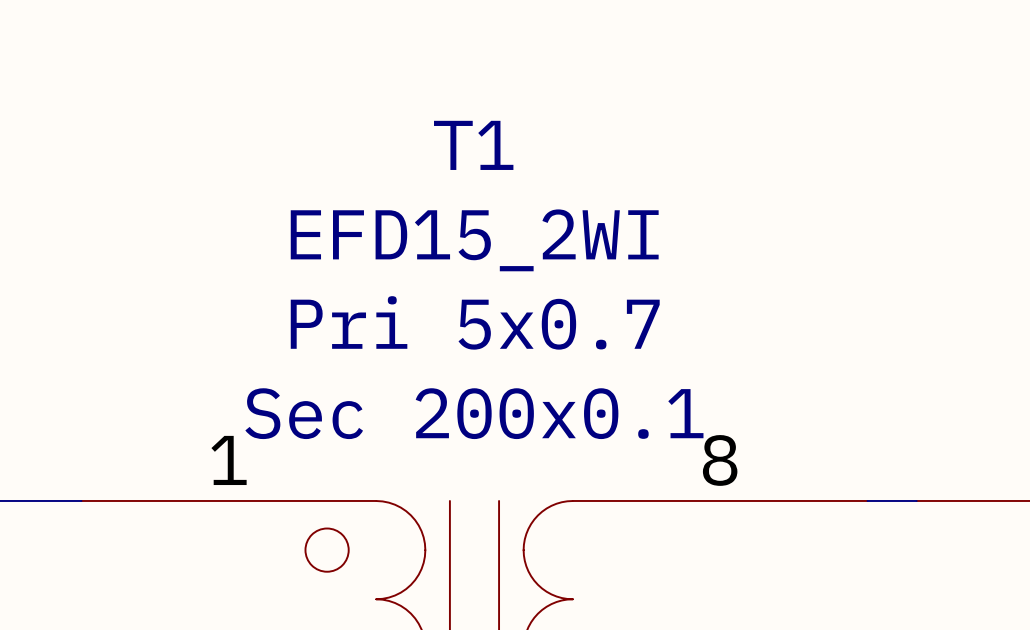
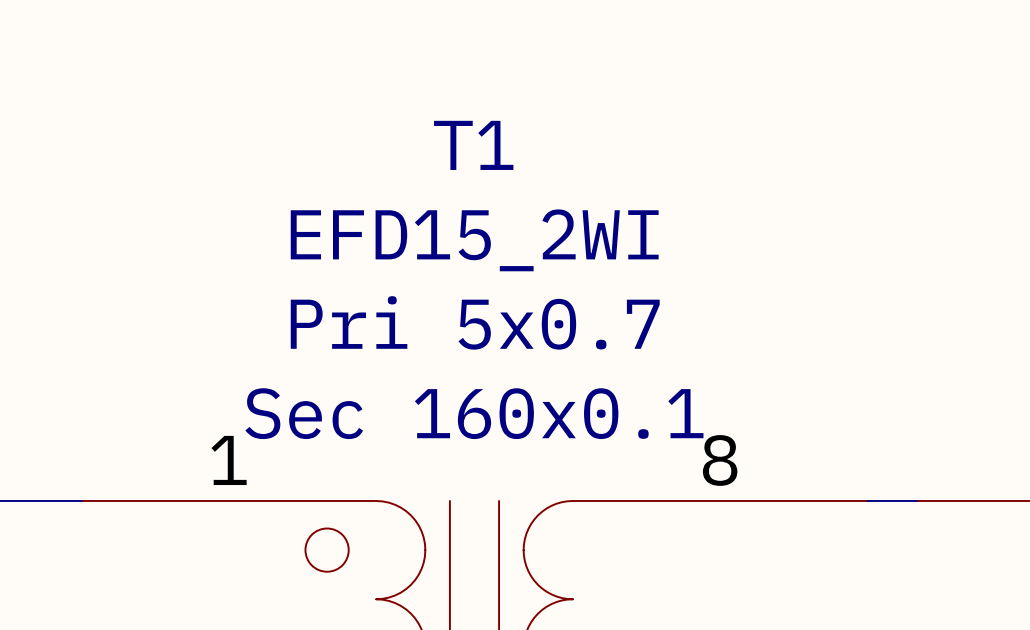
T1 text: Sec 200x0.1 (474, 413) -> Sec 160x0.1 (474, 413)

